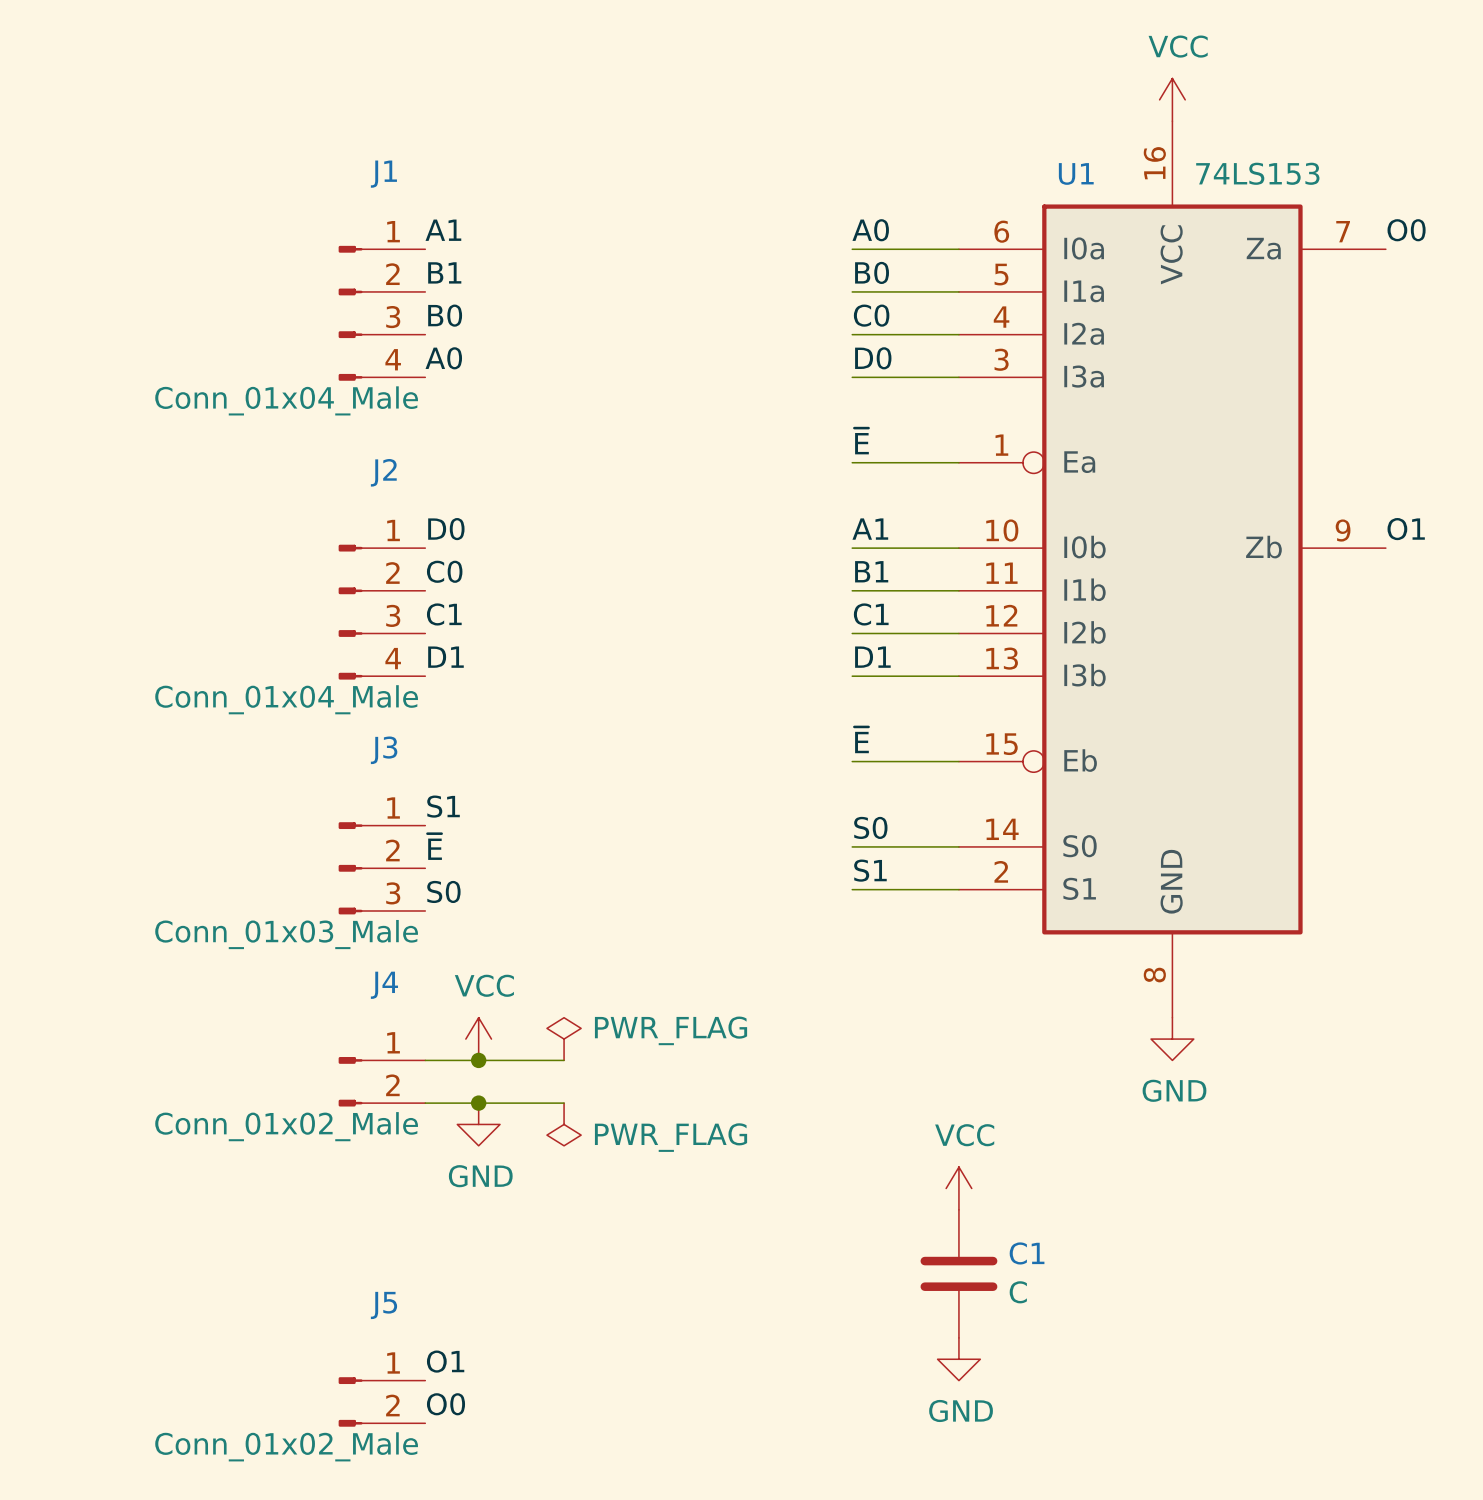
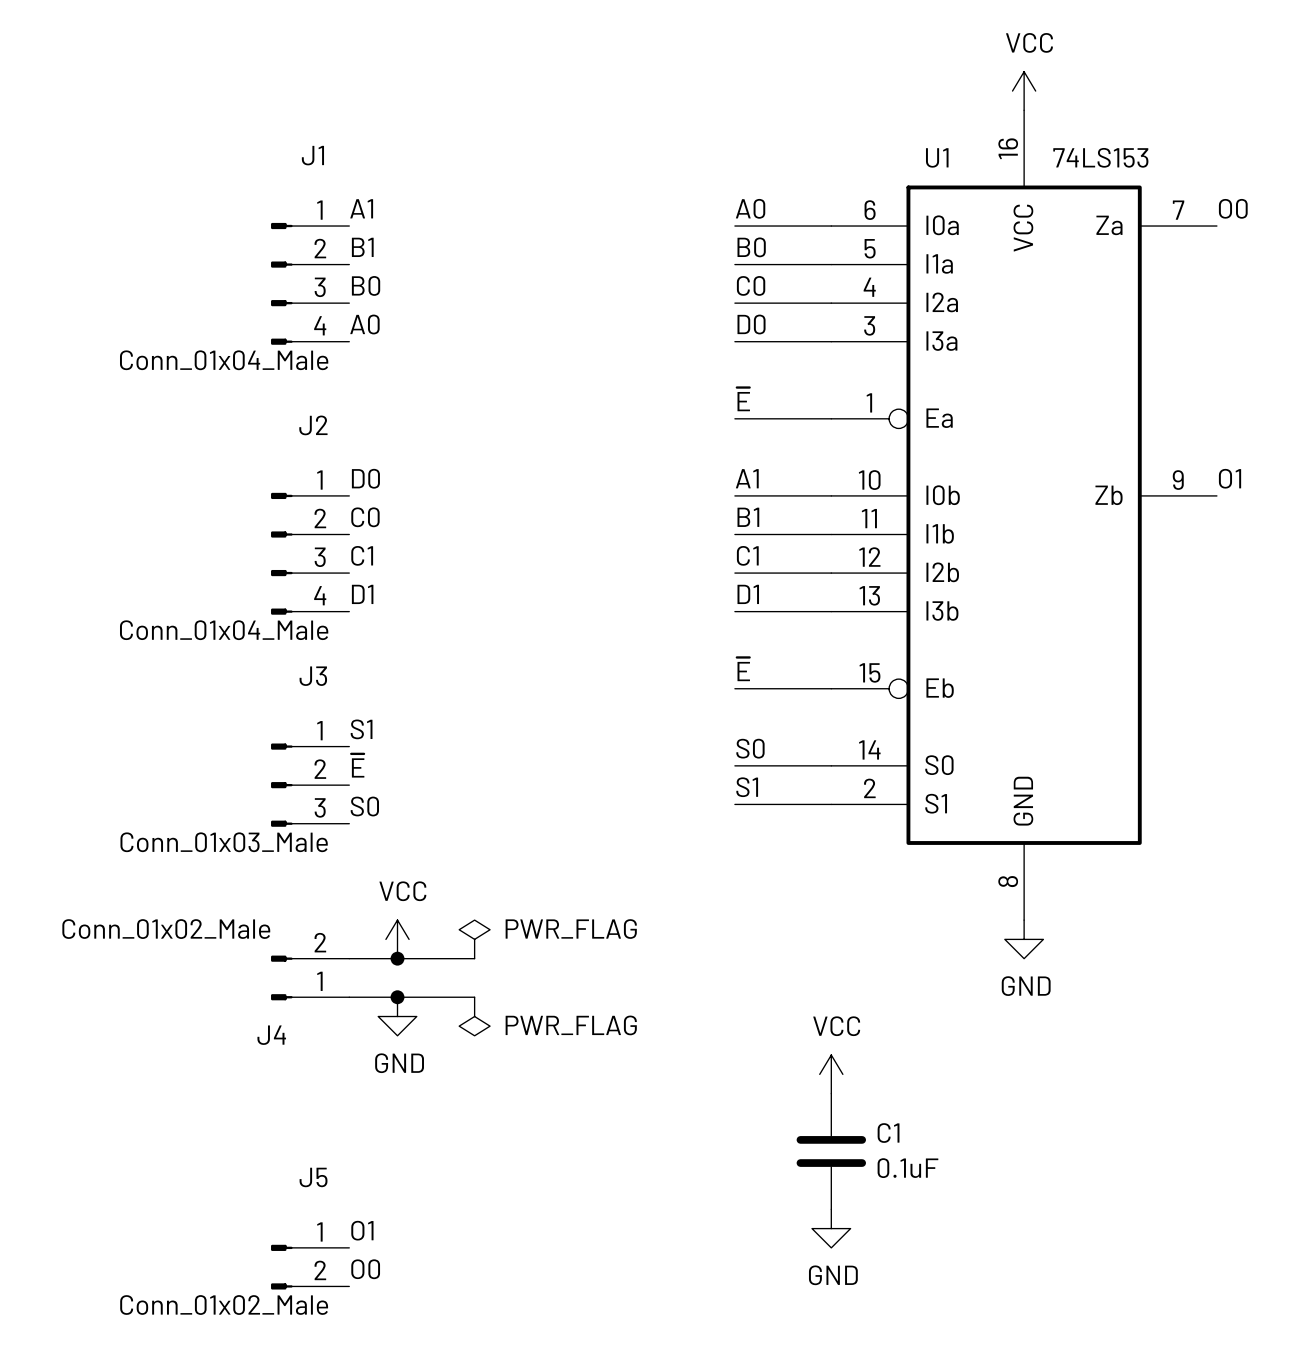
J4 name position: J4 (384, 985) -> J4 (271, 1035)
J4 flip: as is (350, 1081) -> up-down (281, 977)
J4 value position: Conn_01x02_Male (286, 1126) -> Conn_01x02_Male (166, 929)
C1 value: C (1018, 1292) -> 0.1uF (907, 1168)

